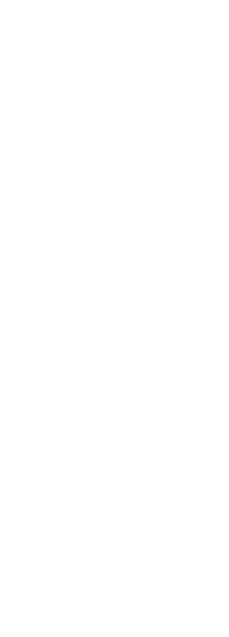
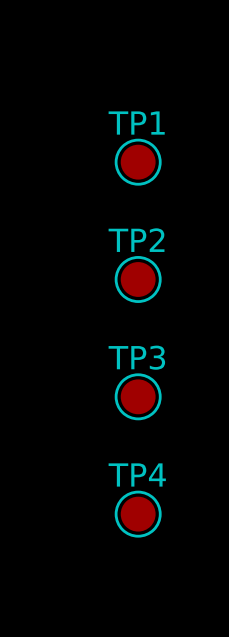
TP1: none -> (138, 162)
TP2: none -> (138, 279)
TP3: none -> (138, 396)
TP4: none -> (138, 514)

